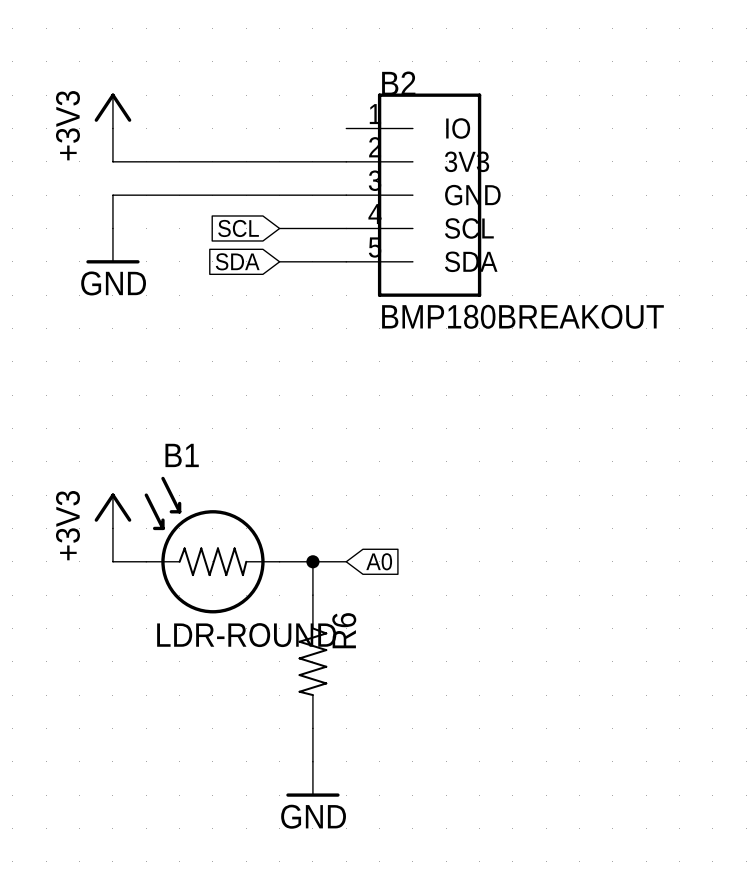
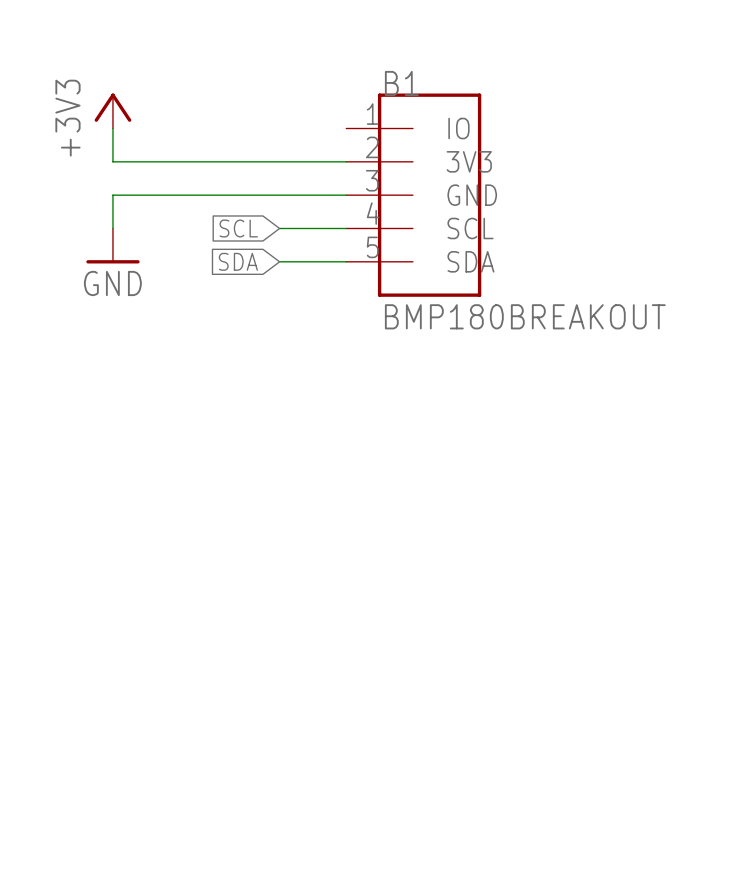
B2 name: B2 (398, 83) -> B1 (401, 83)
power symbol: +3V3 (112, 510) -> none
wire: (112, 528) (112, 561) (146, 561) -> none
B1: LDR-ROUND (212, 545) -> none
wire: (279, 561) (346, 561) -> none
wire: (312, 561) (312, 595) -> none
junction: (312, 561) -> none
global label: A0 (379, 561) -> none
R6: (312, 661) -> none
wire: (312, 728) (312, 761) -> none
power symbol: GND (312, 779) -> none

